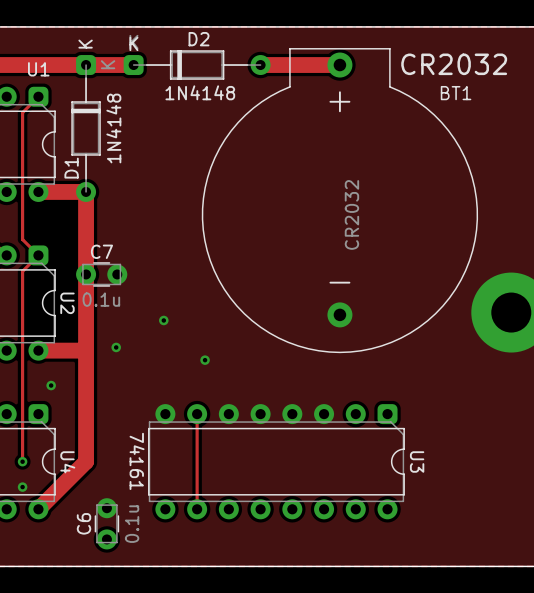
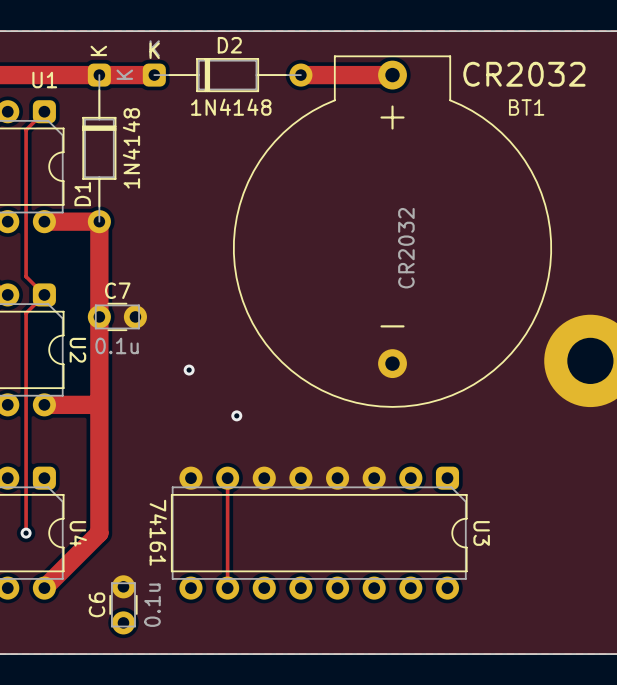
via: (116, 347) -> none
via: (51, 385) -> none
via: (22, 487) -> none

